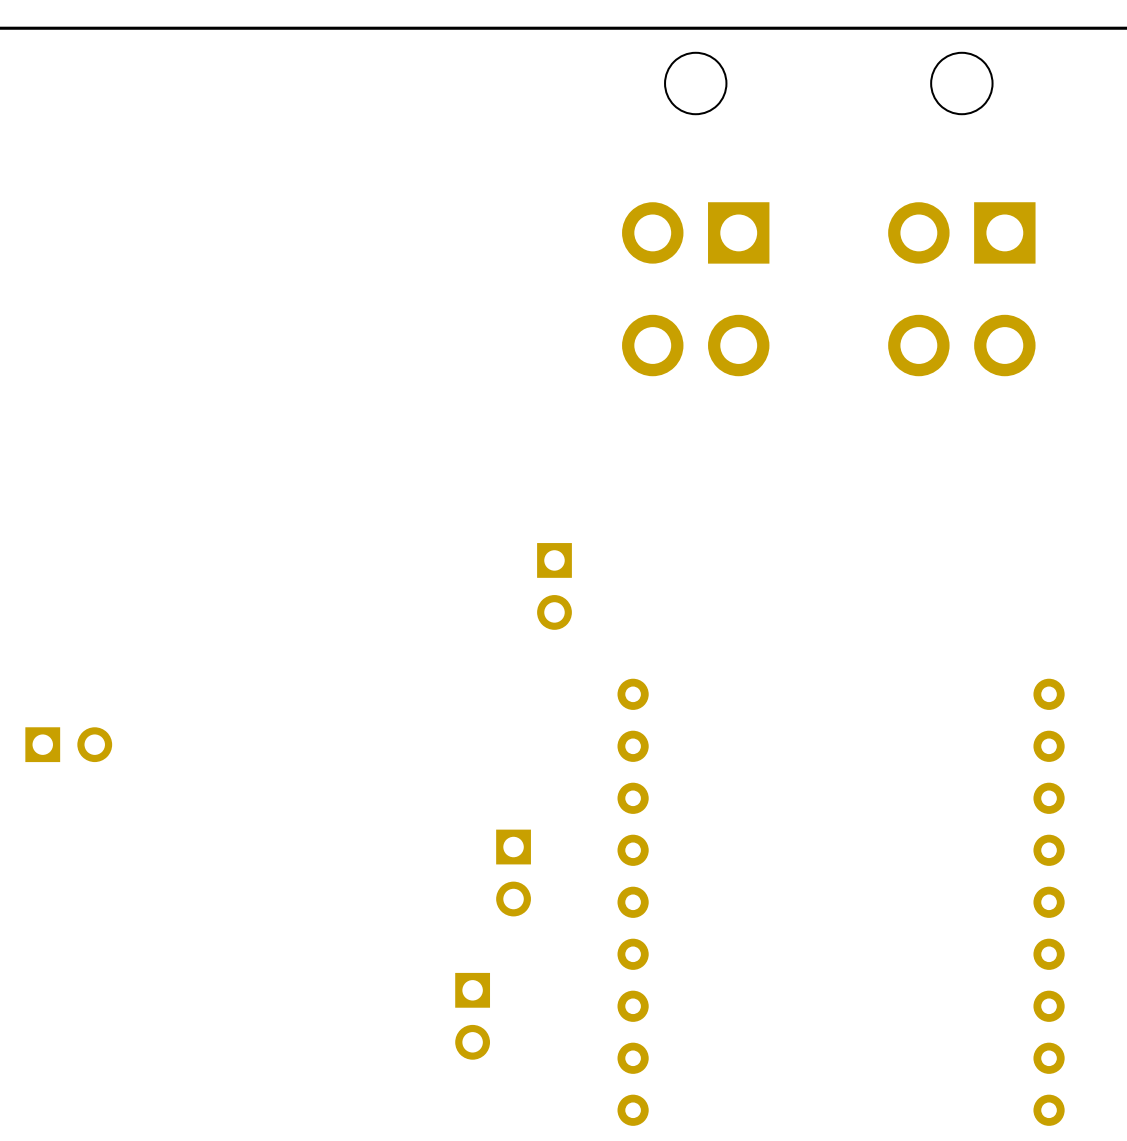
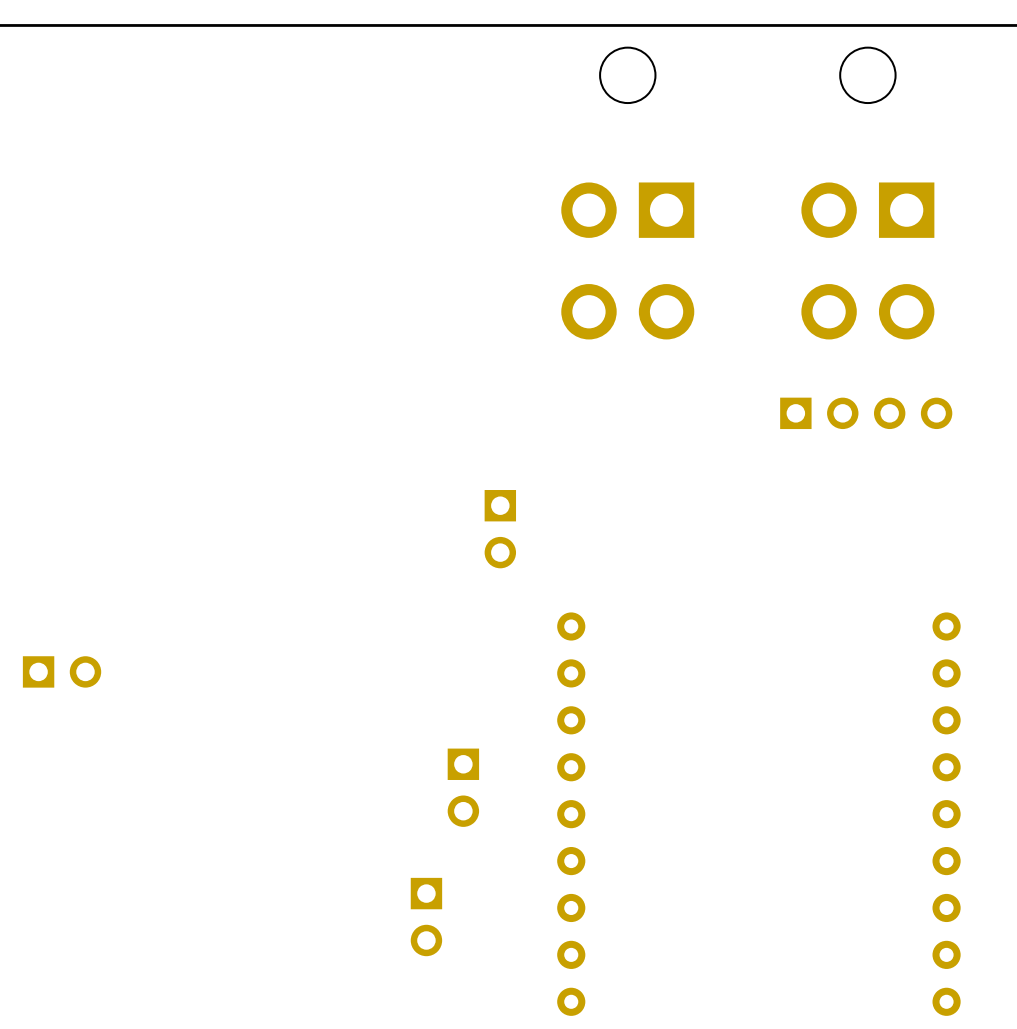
part: none -> (866, 413)

